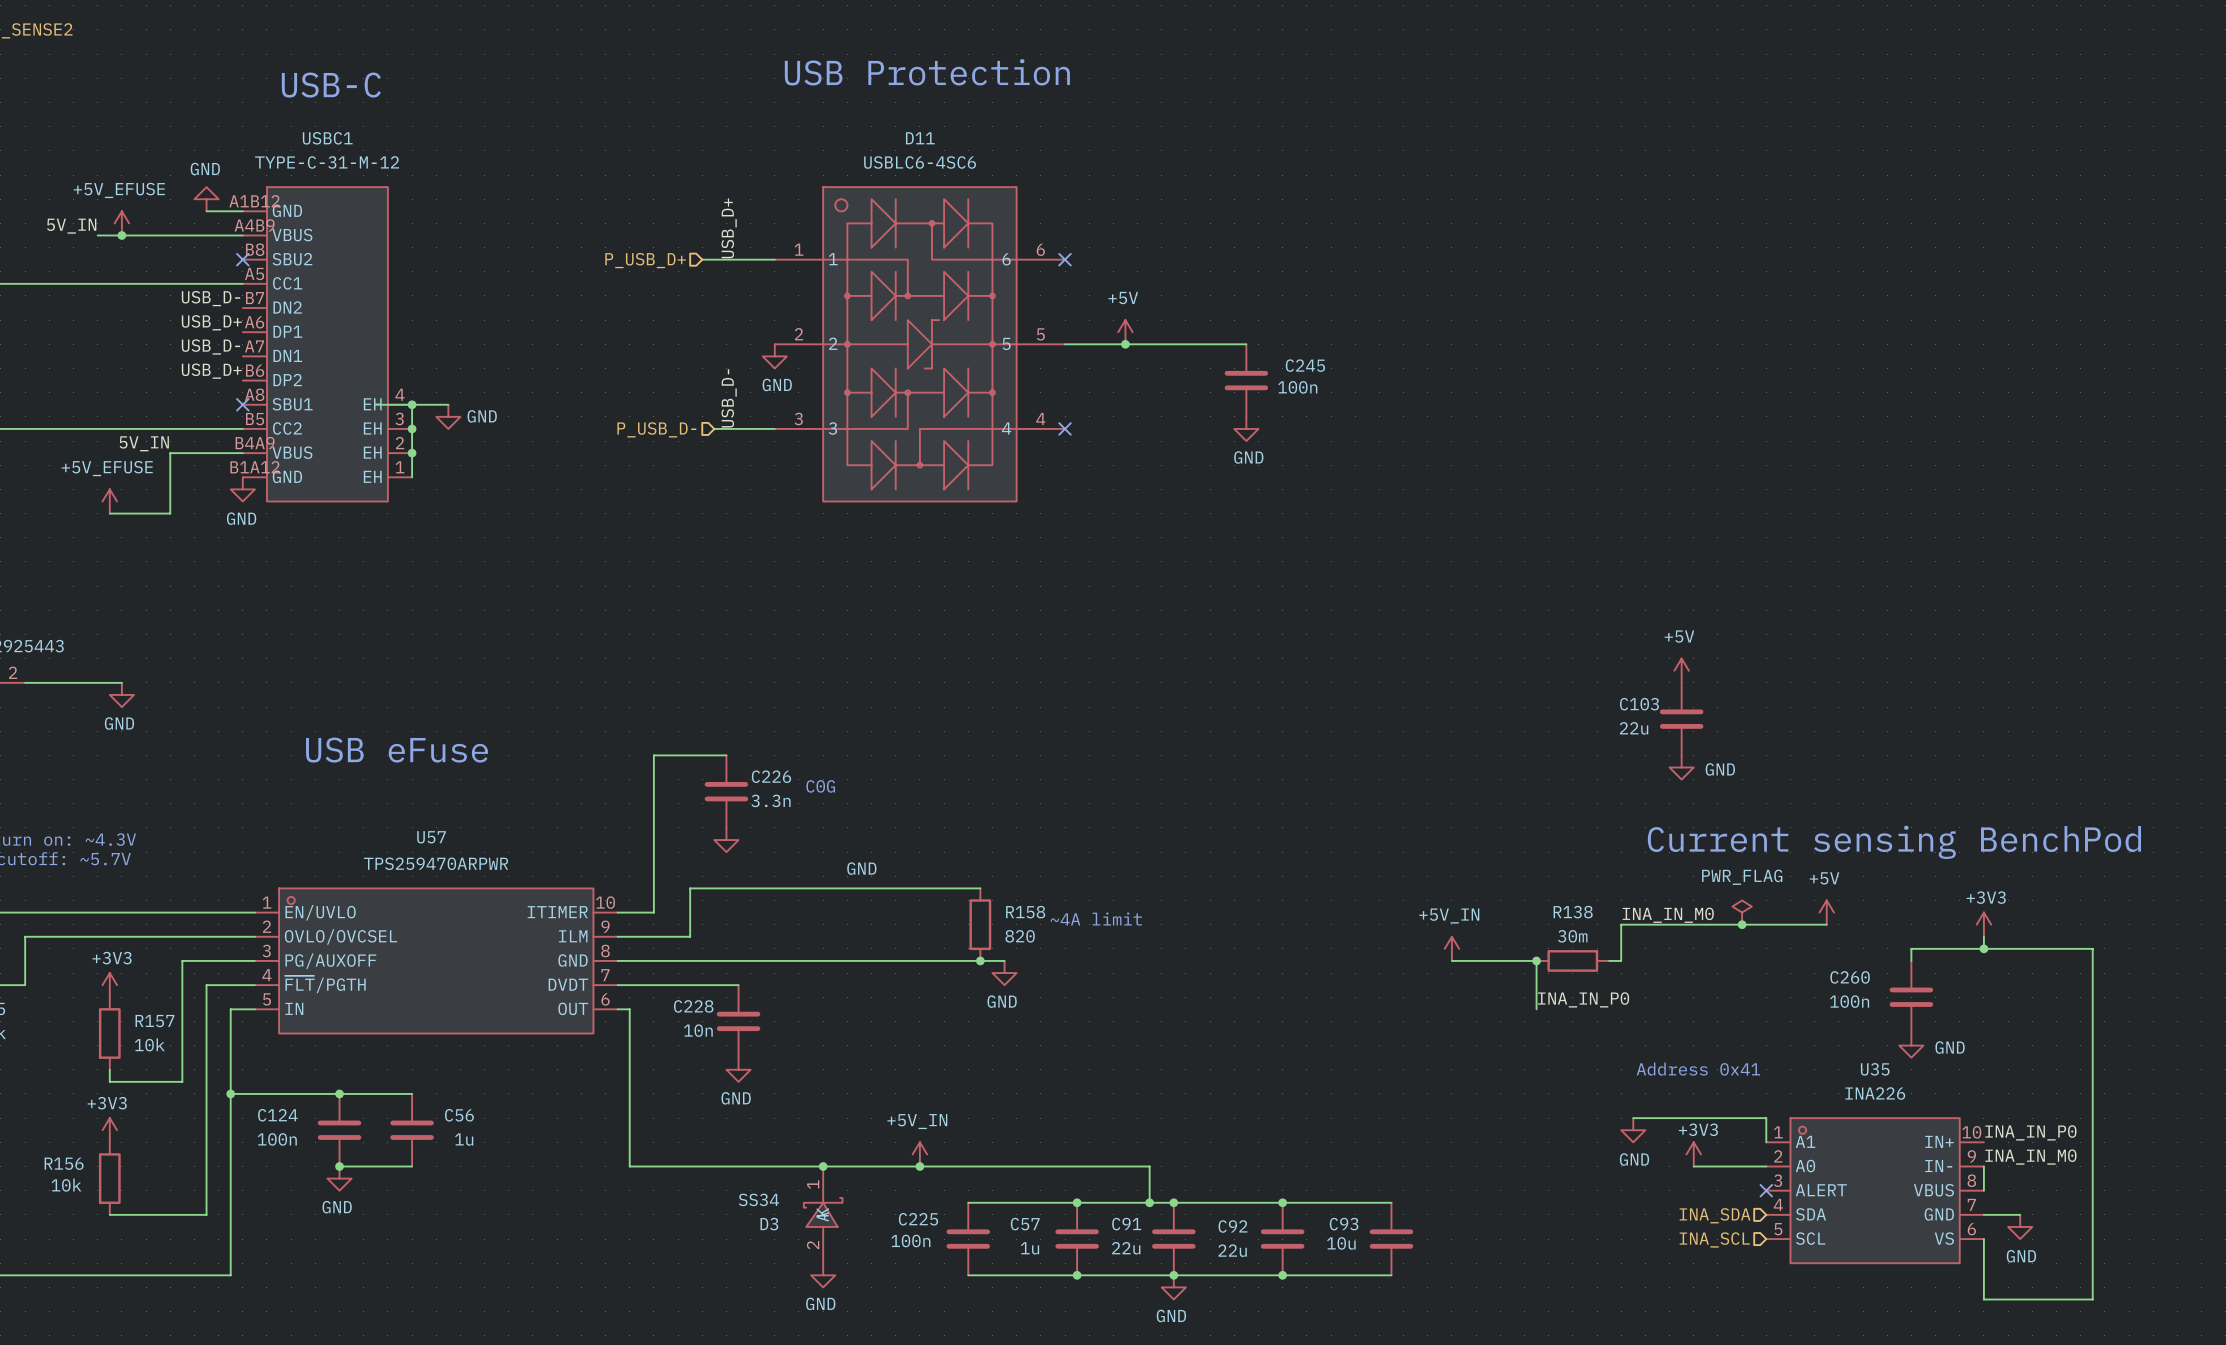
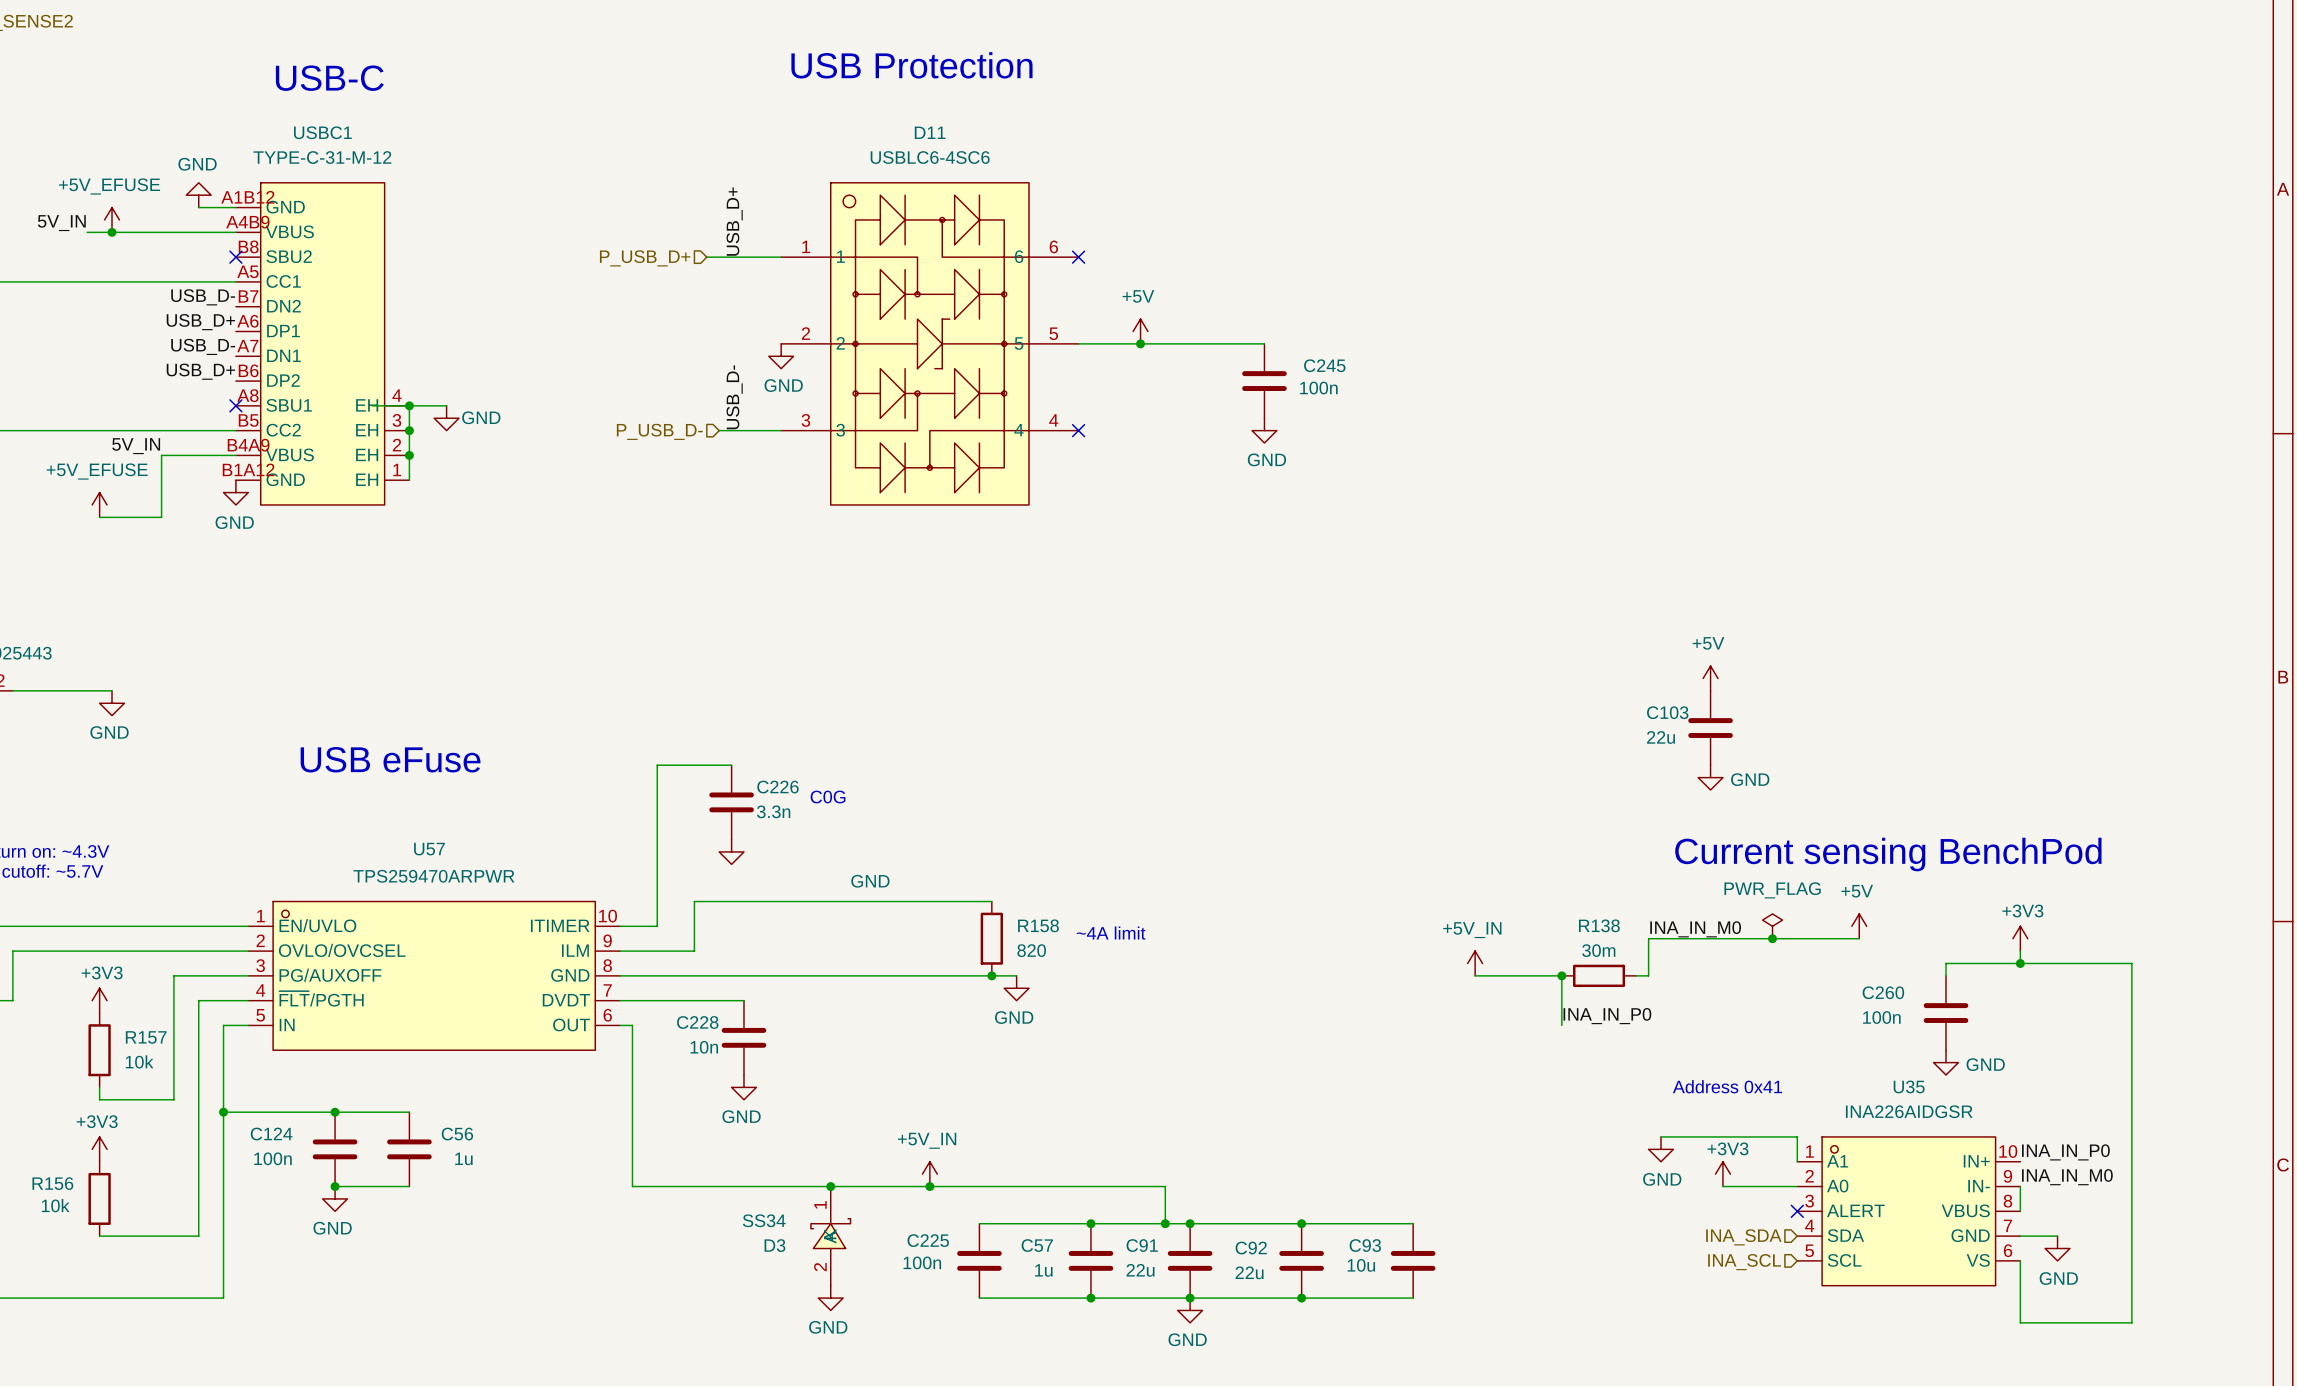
U35 value: INA226 (1875, 1093) -> INA226AIDGSR (1909, 1111)

